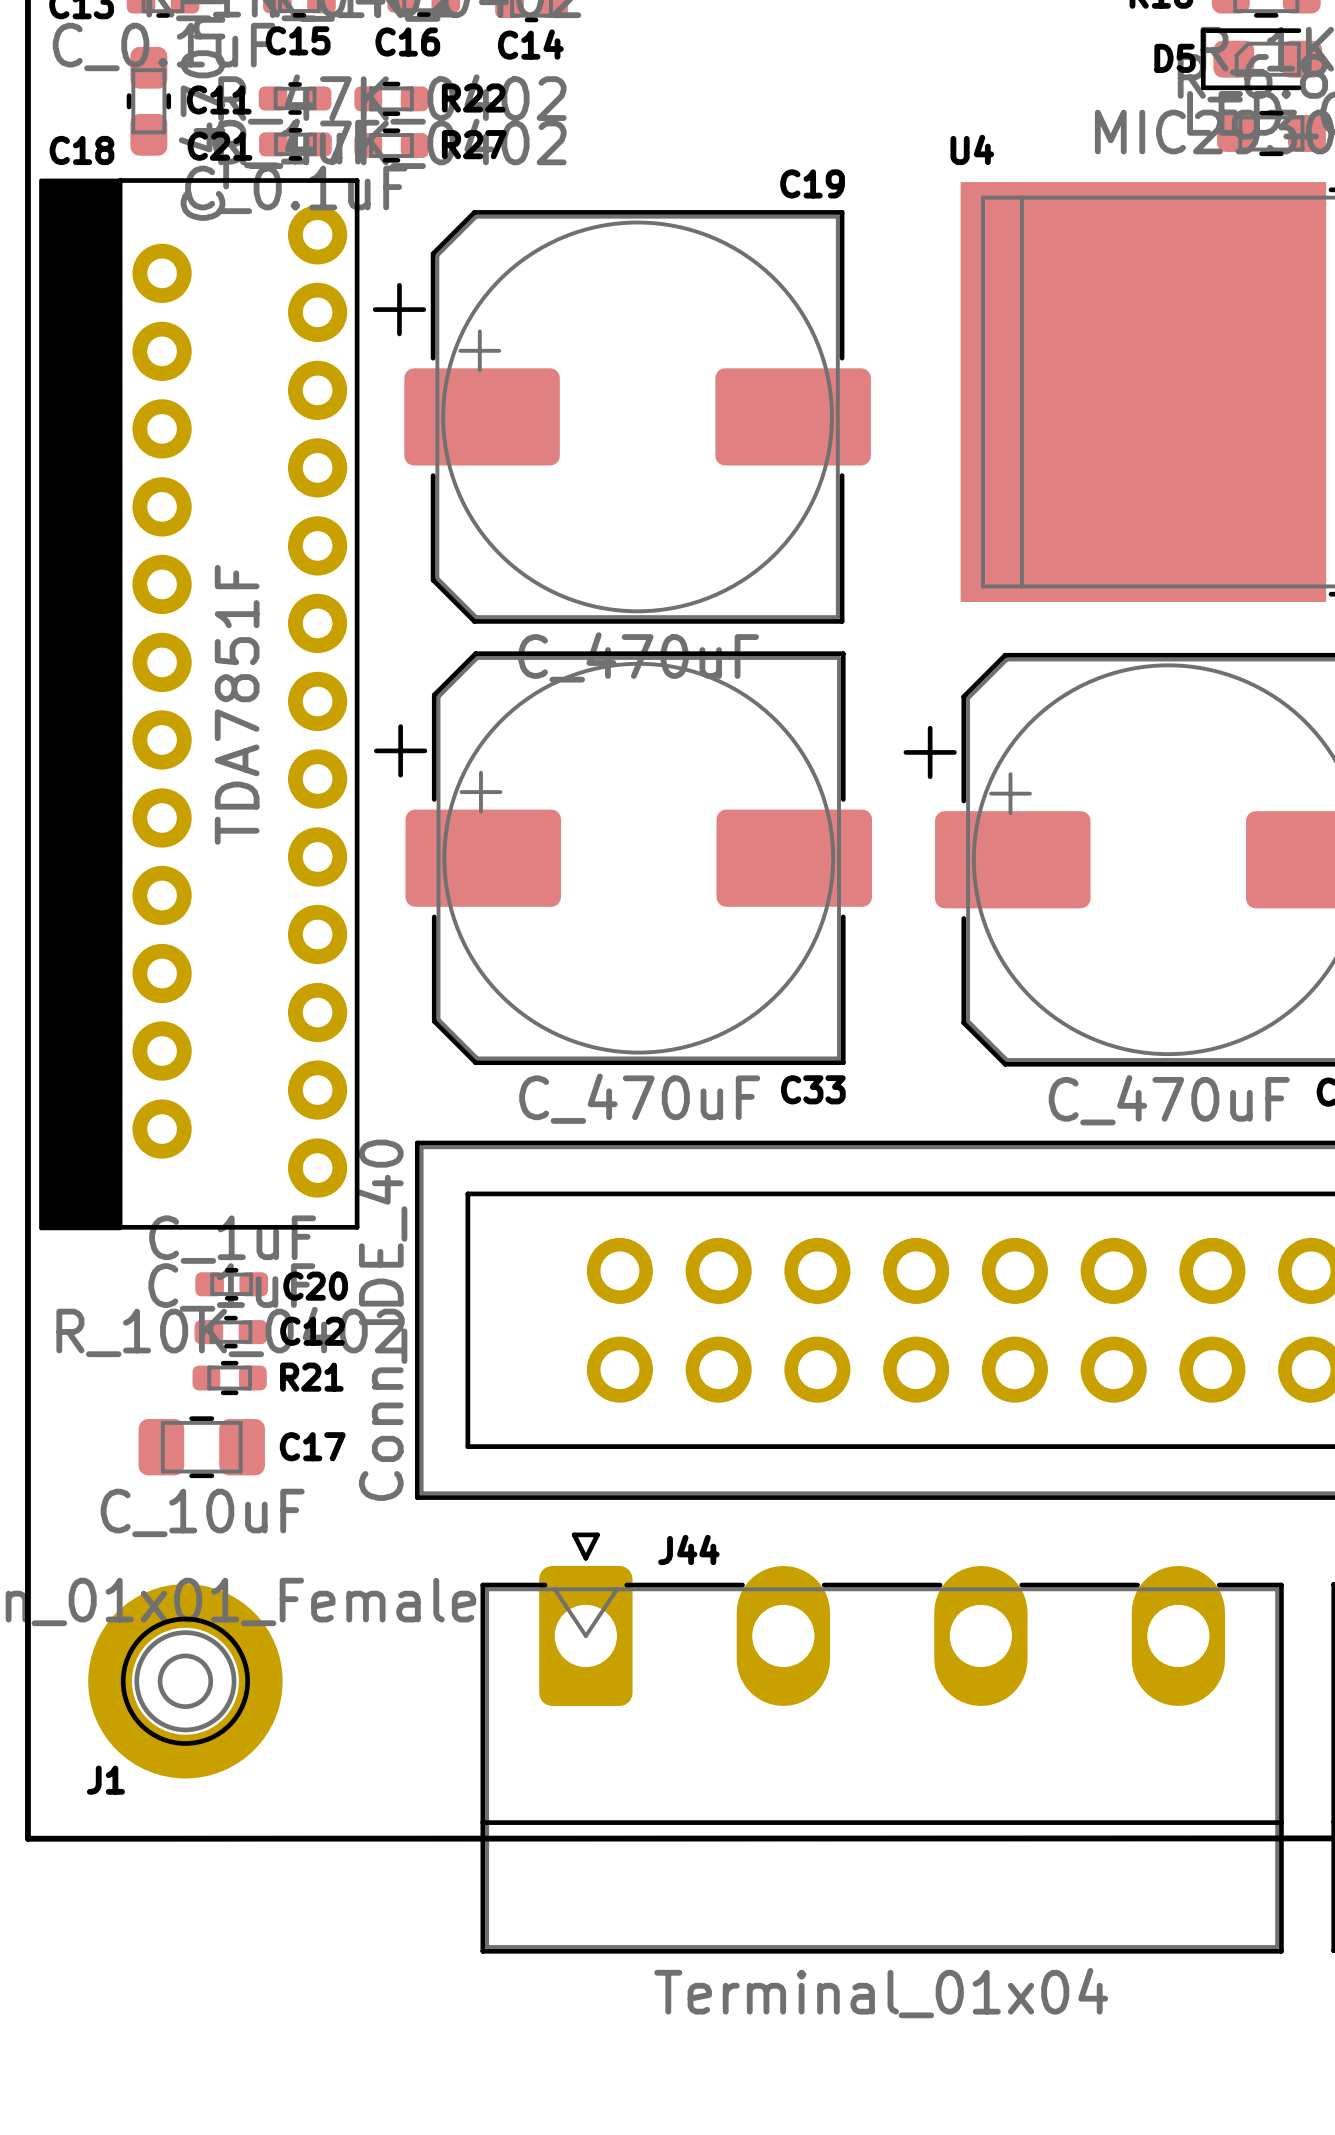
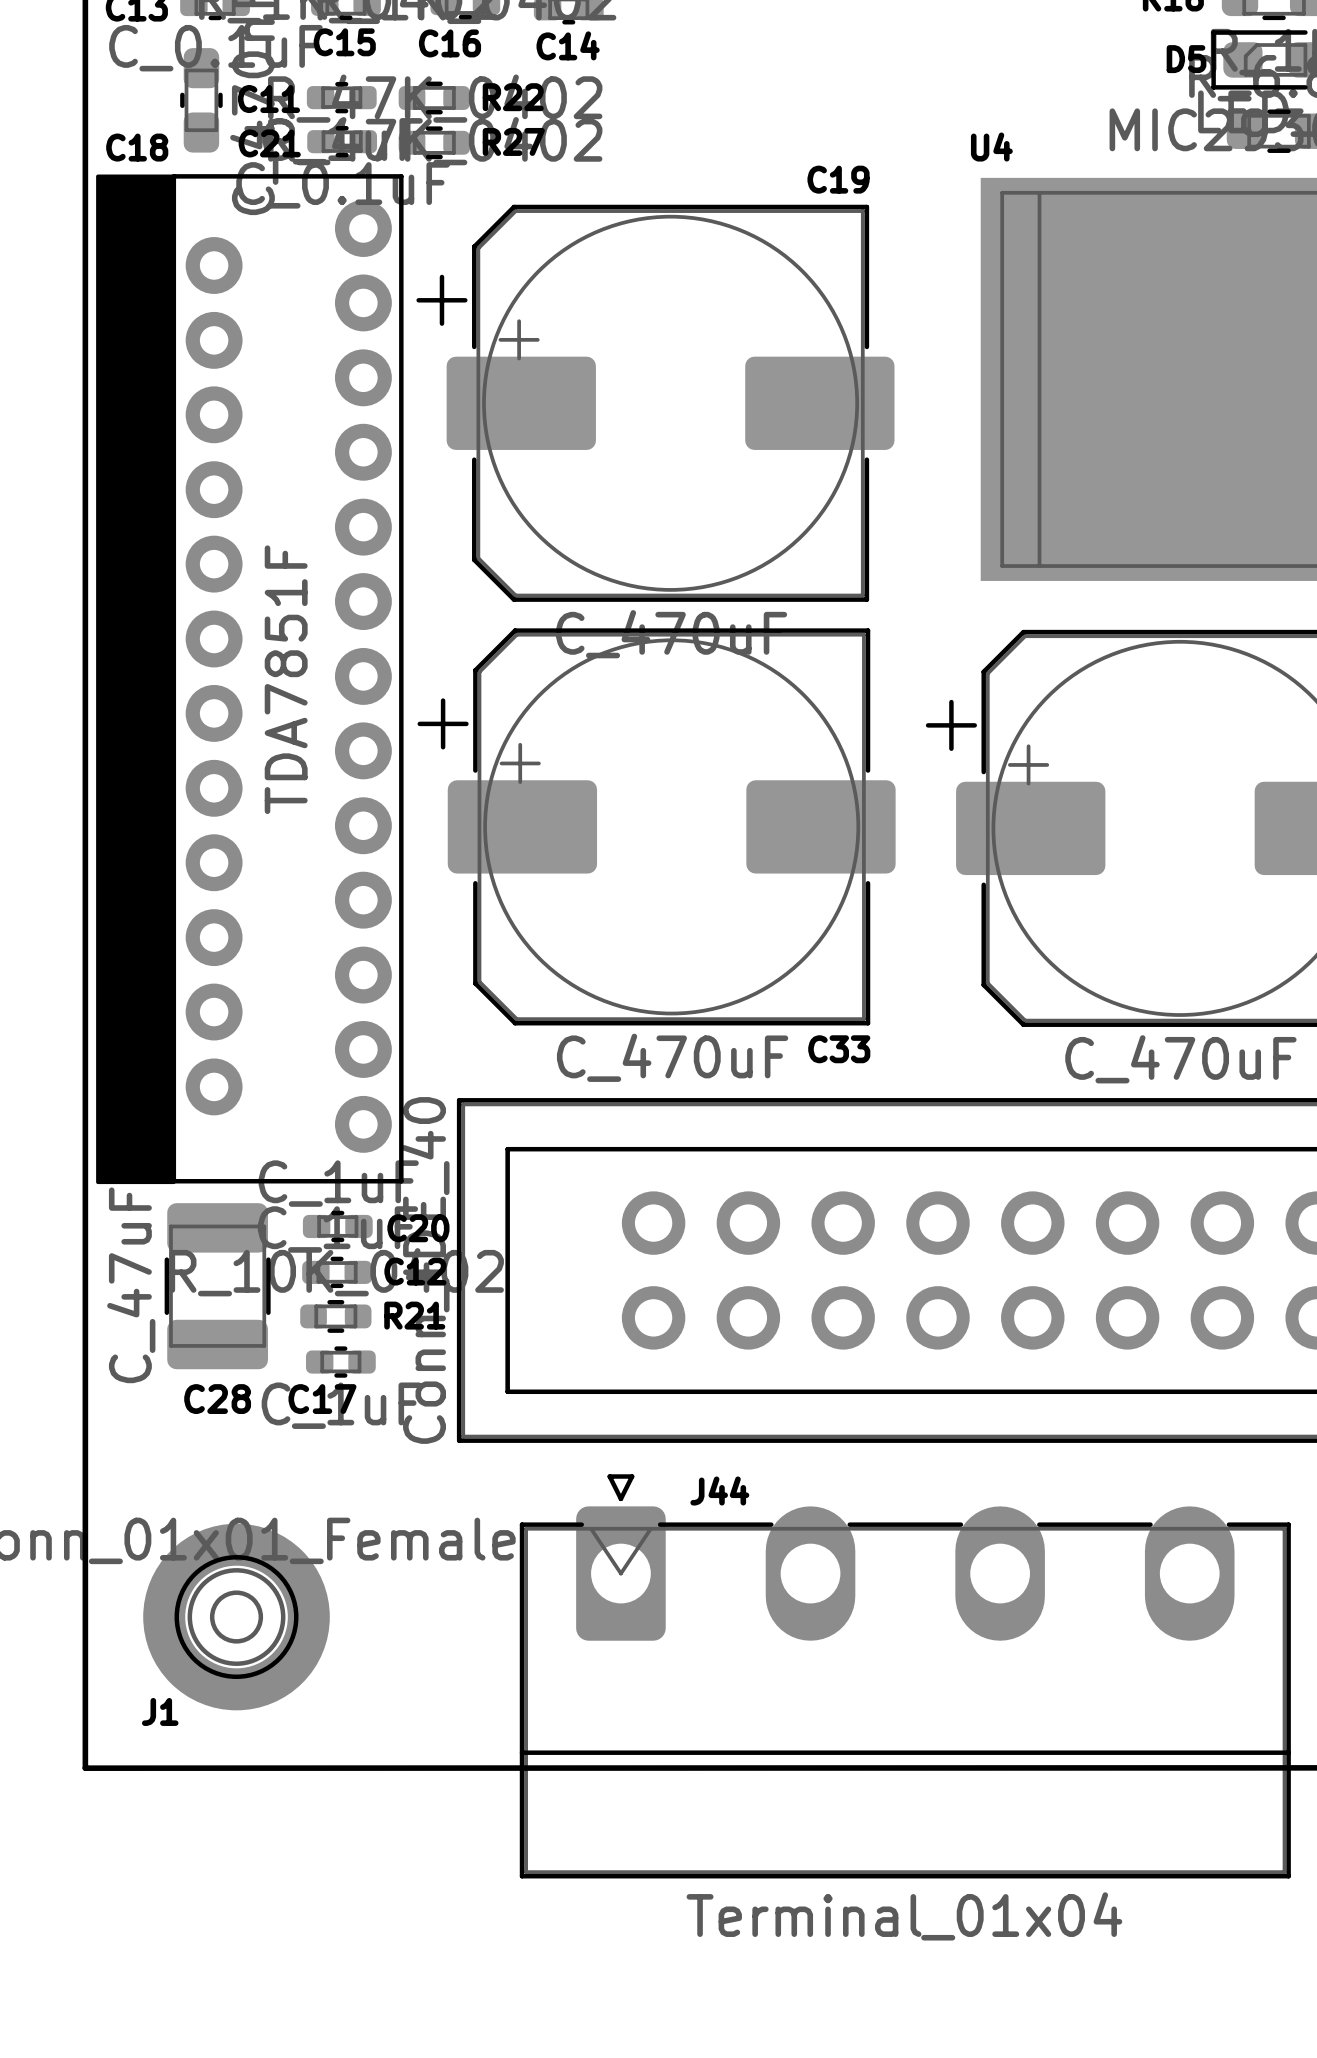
C20 position: (231, 1284) -> (337, 1226)
C12 position: (230, 1332) -> (337, 1272)
C28: none -> C_47uF (217, 1286)
R21 position: (229, 1378) -> (335, 1316)
C17 footprint: [138, 1416, 265, 1479] -> [305, 1346, 376, 1378]
C17 name position: C17 (312, 1446) -> C17 (322, 1399)
C17 value: C_10uF (202, 1512) -> C_1uF (341, 1405)

